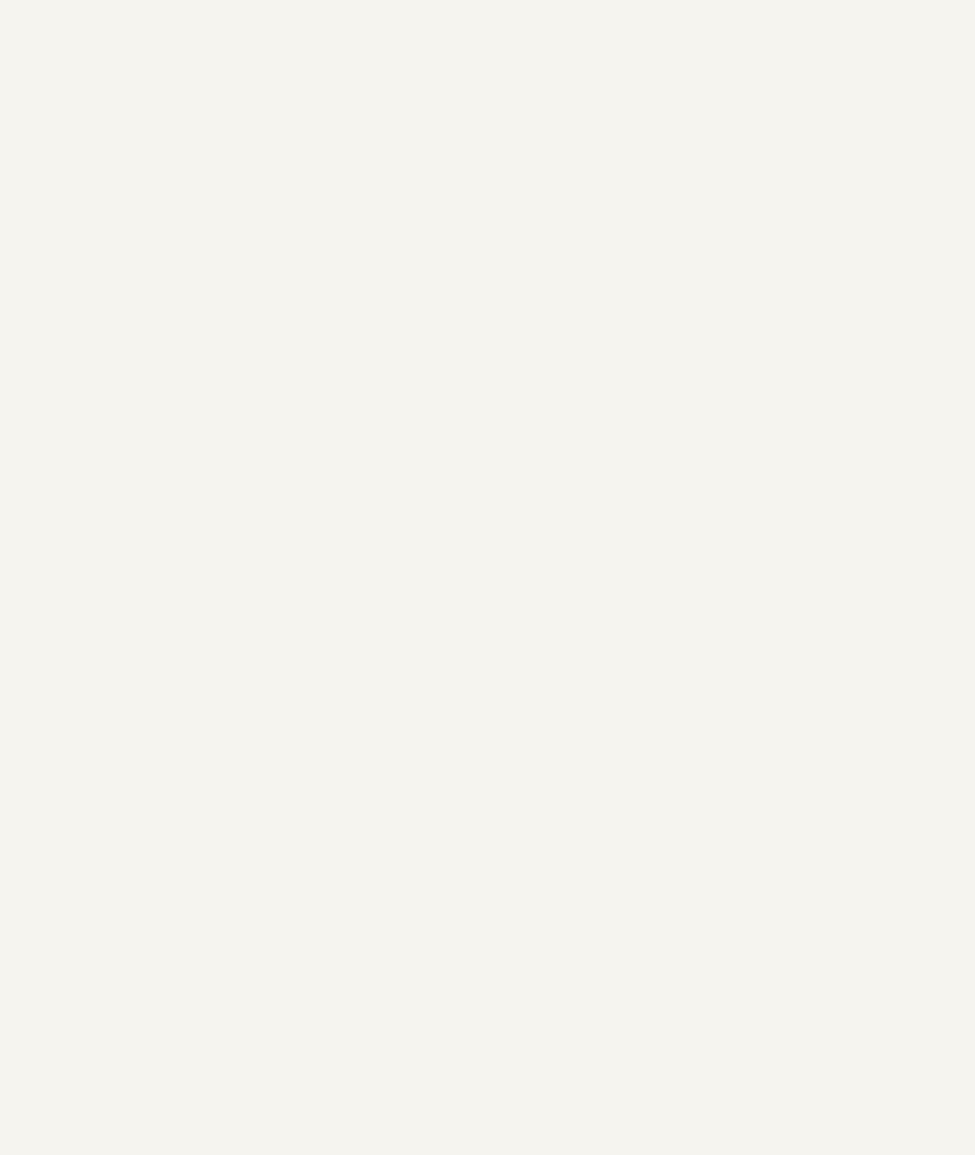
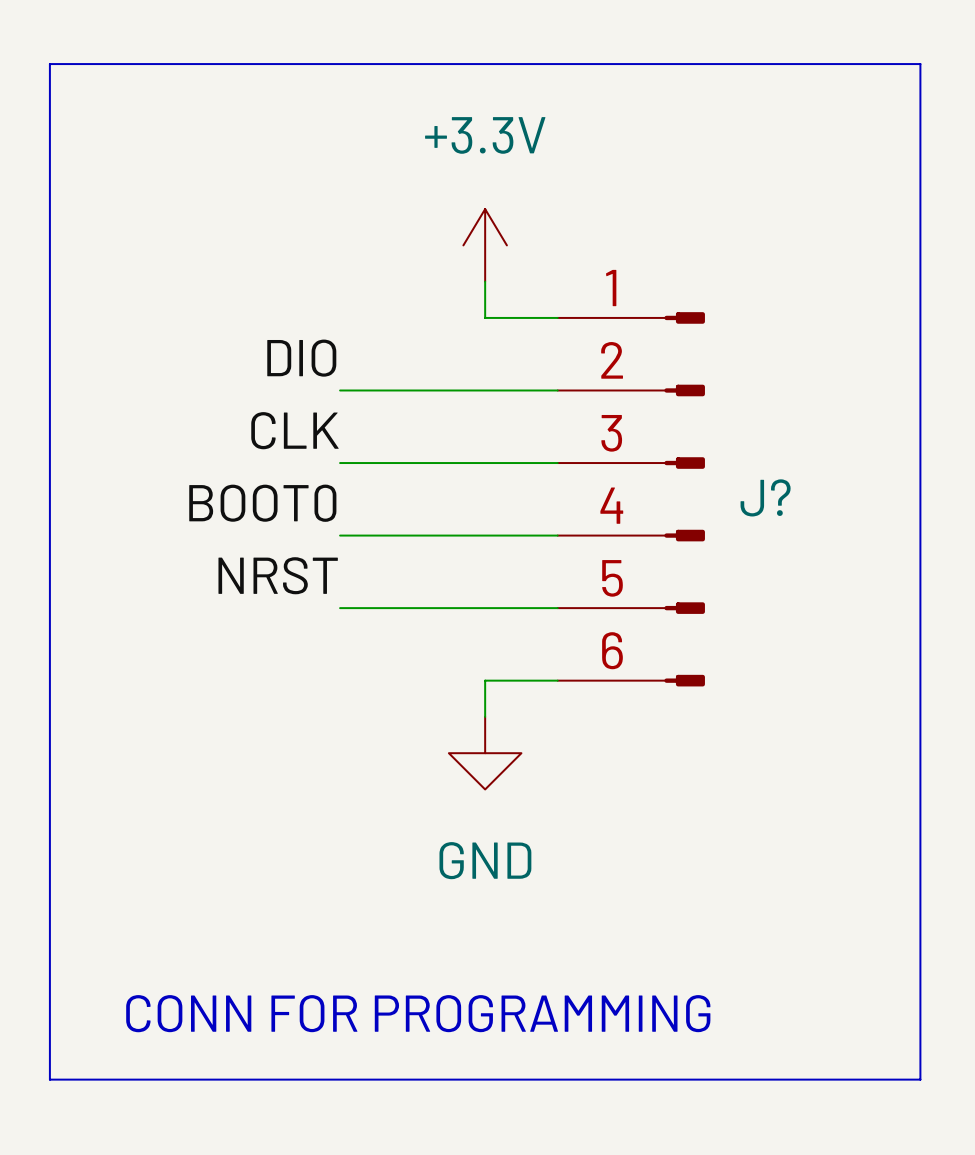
line: none -> (49, 64) (49, 1079) (920, 1079) (920, 64) (49, 64)
power symbol: none -> +3.3V (485, 245)
wire: none -> (485, 281) (485, 317) (557, 317)
label: none -> DIO (301, 358)
wire: none -> (340, 390) (557, 390)
label: none -> CLK (294, 430)
wire: none -> (340, 463) (557, 463)
J?: none -> (631, 499)
label: none -> BOOT0 (262, 503)
wire: none -> (340, 535) (557, 535)
label: none -> NRST (278, 575)
wire: none -> (340, 608) (557, 608)
wire: none -> (557, 680) (485, 680) (485, 716)
power symbol: none -> GND (485, 753)
text: none -> CONN FOR PROGRAMMING (418, 1013)

